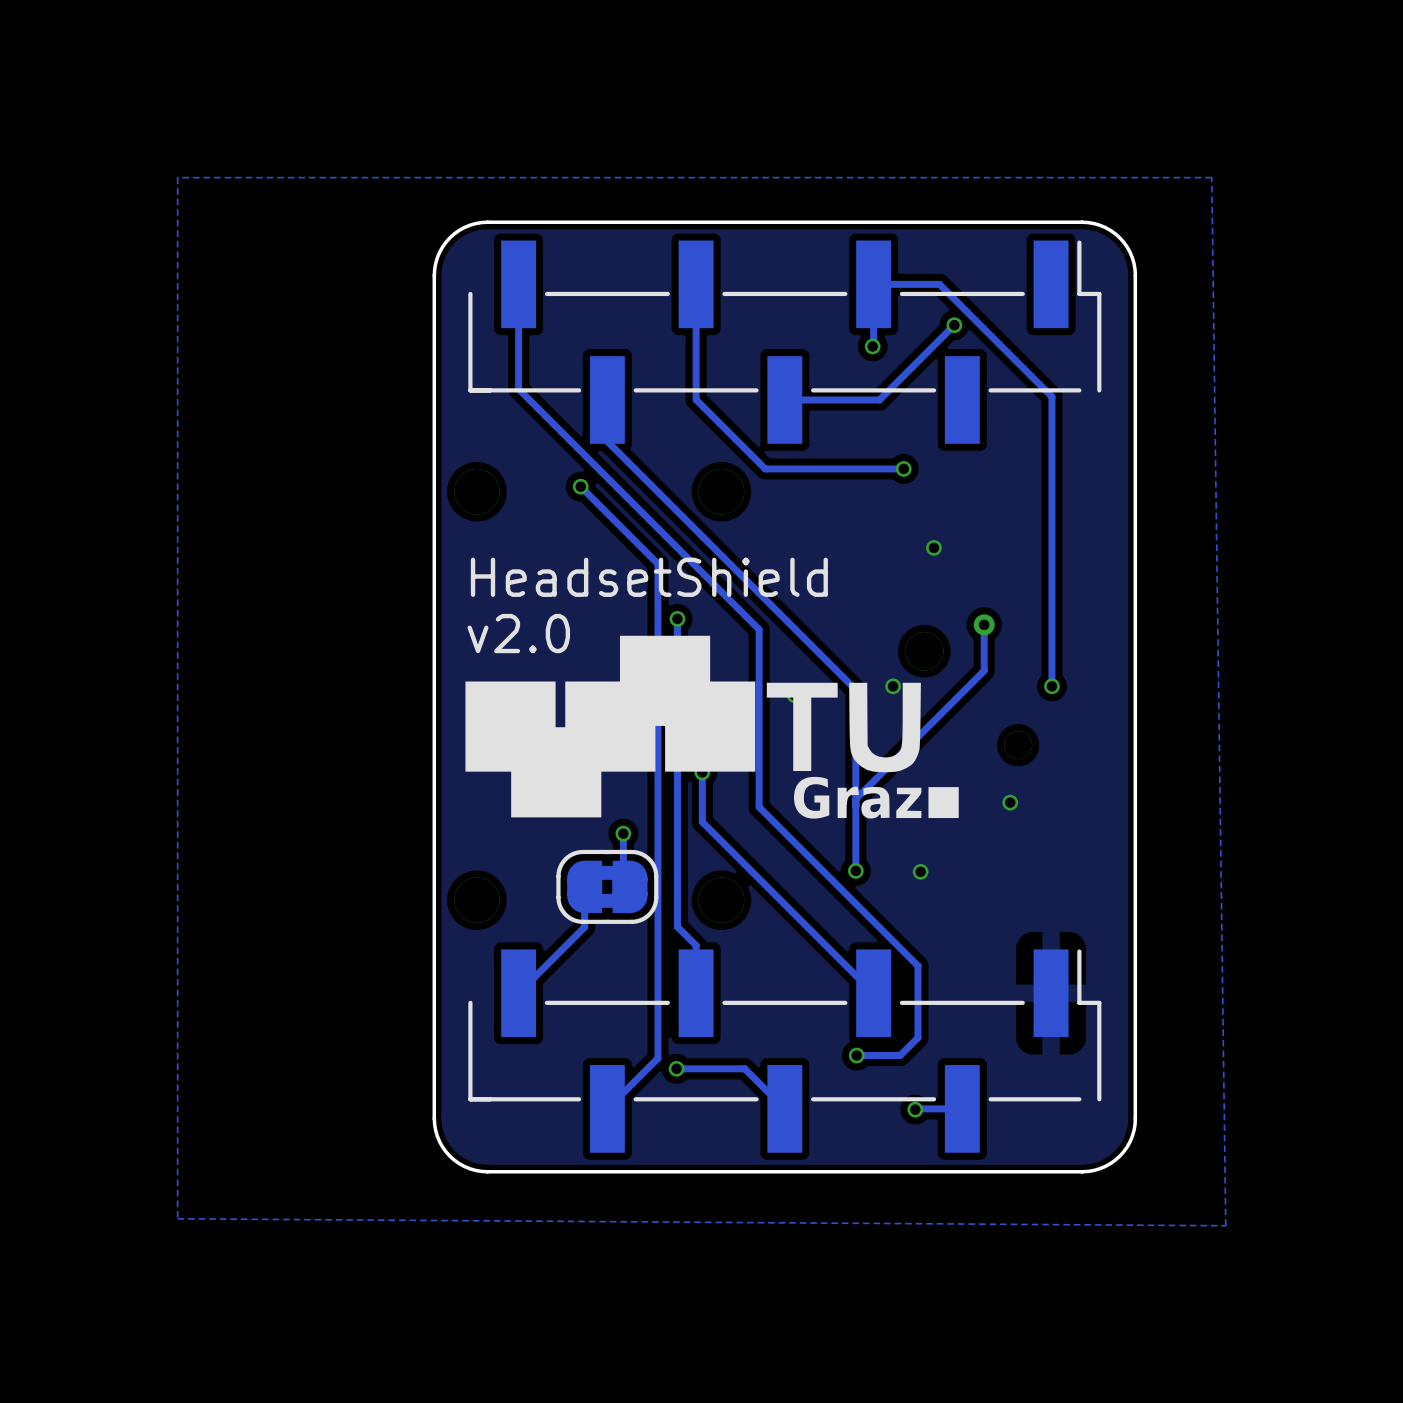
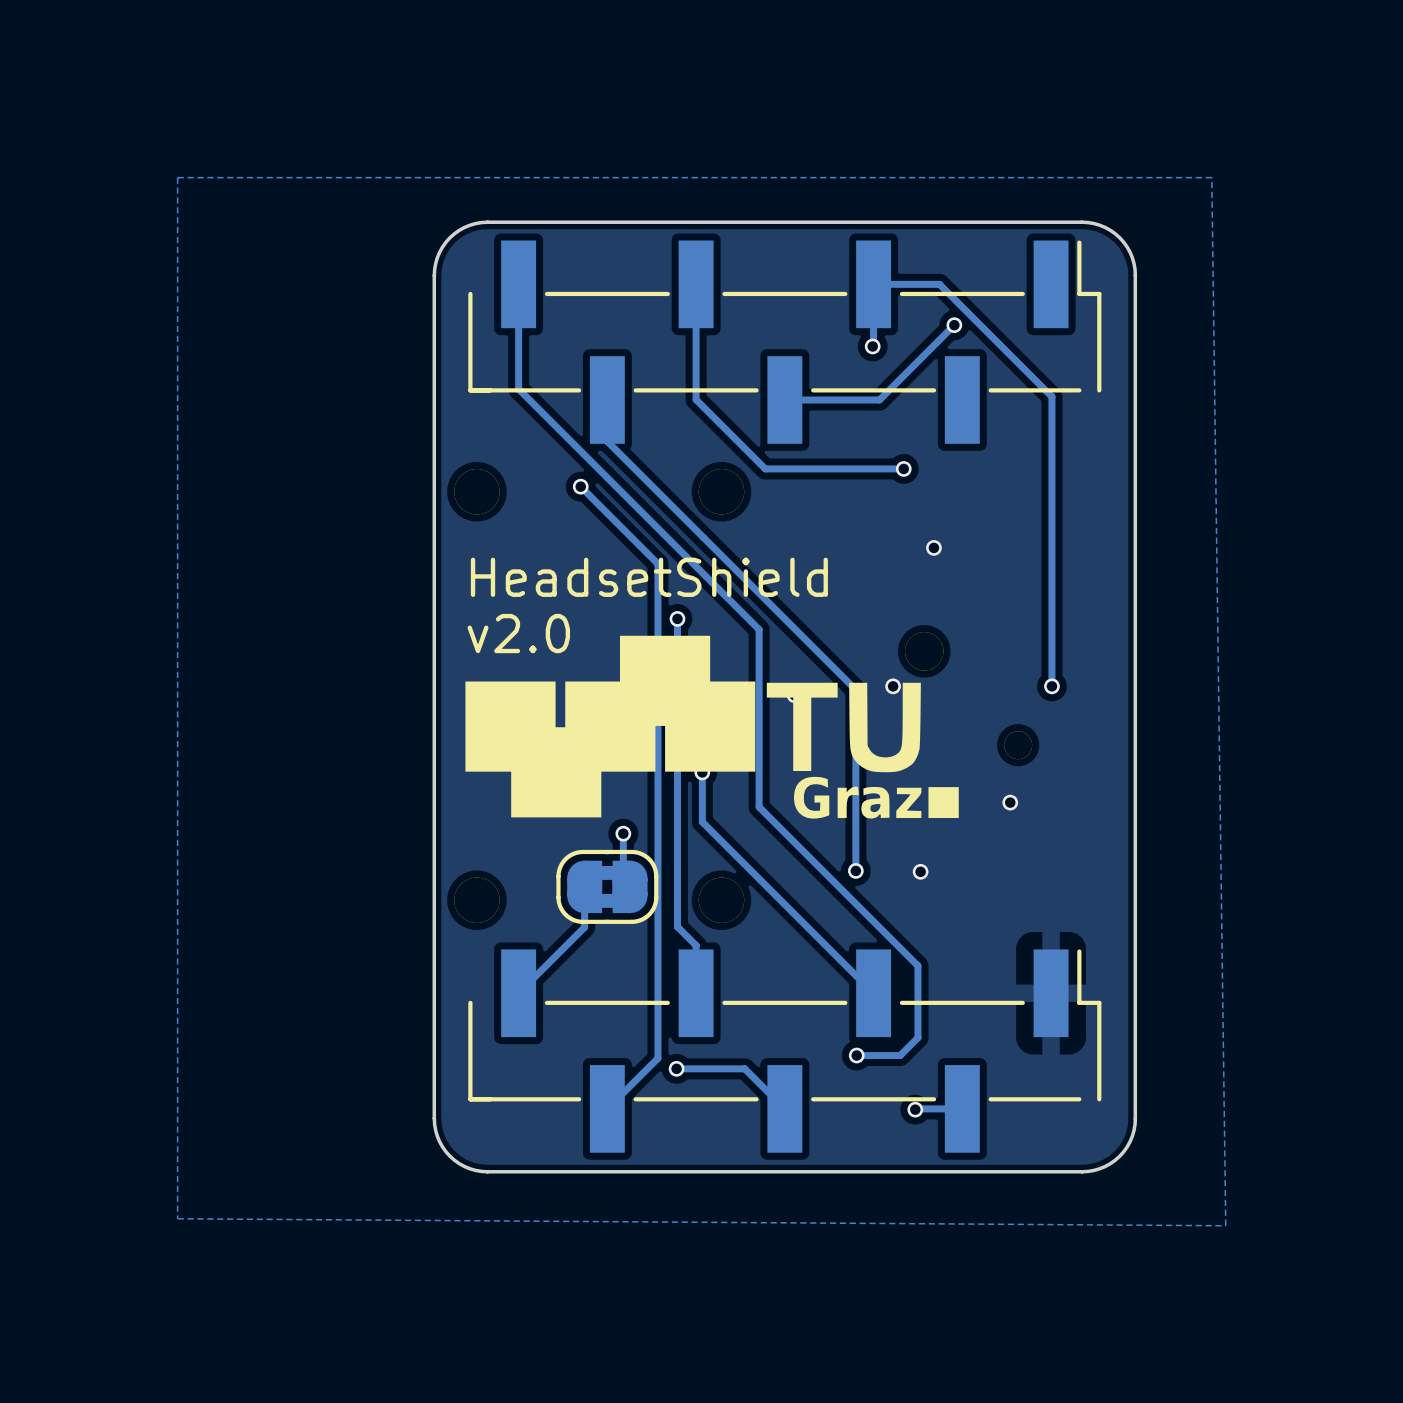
track: (984, 624) (984, 670) (855, 799) -> none
via: (984, 624) -> none

